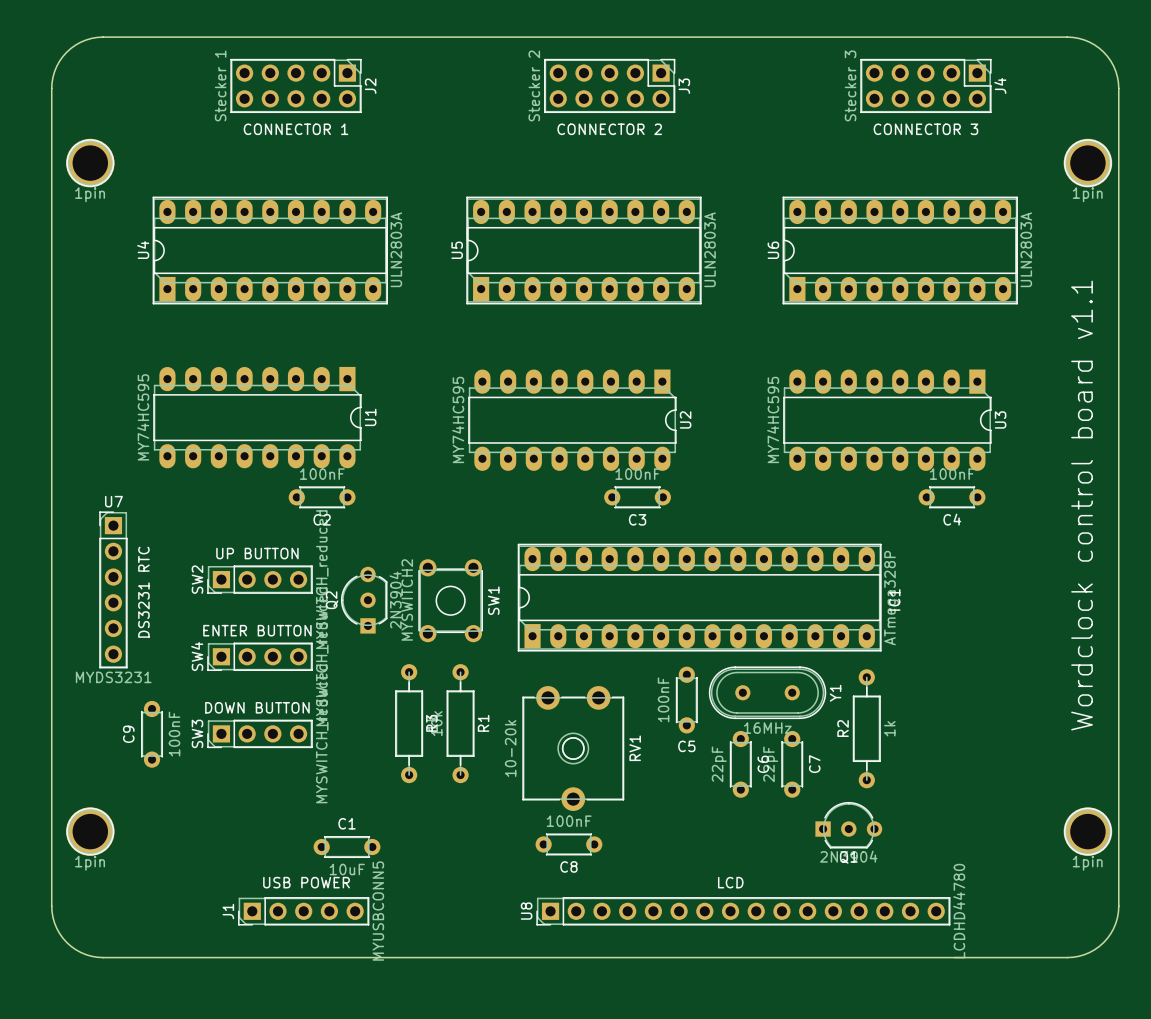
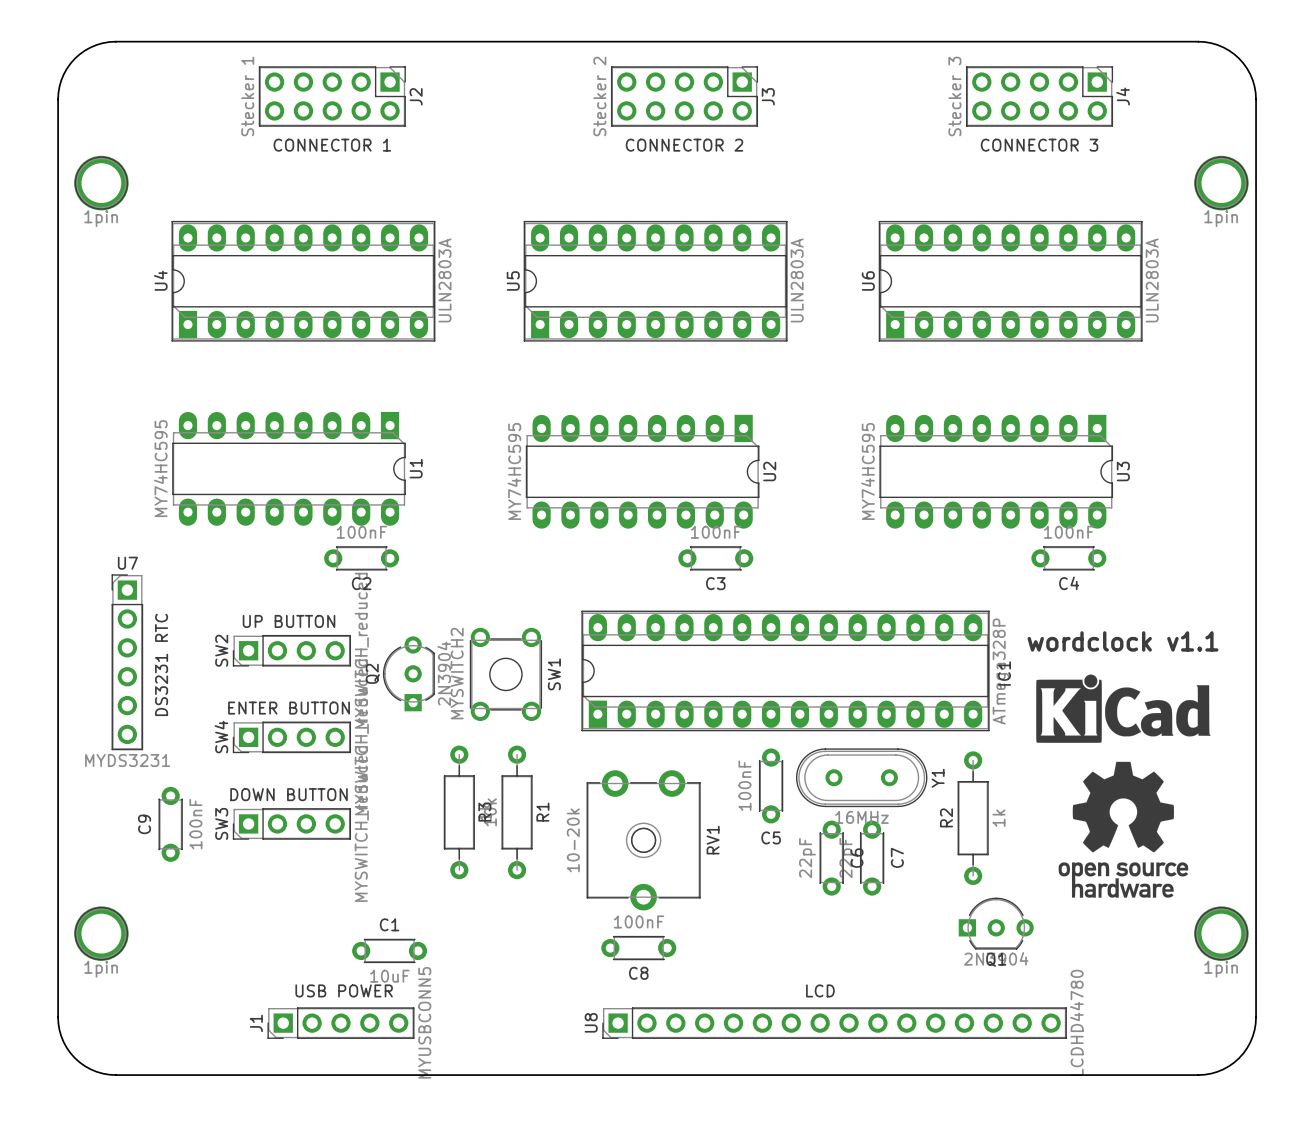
text: Wordclock control board v1.1 (1082, 505) -> wordclock v1.1 (1123, 641)
drawing: none -> [1036, 674, 1211, 743]
drawing: none -> [1058, 761, 1189, 898]
C7 position: (792, 764) -> (872, 858)
Q1 position: (848, 825) -> (996, 923)

